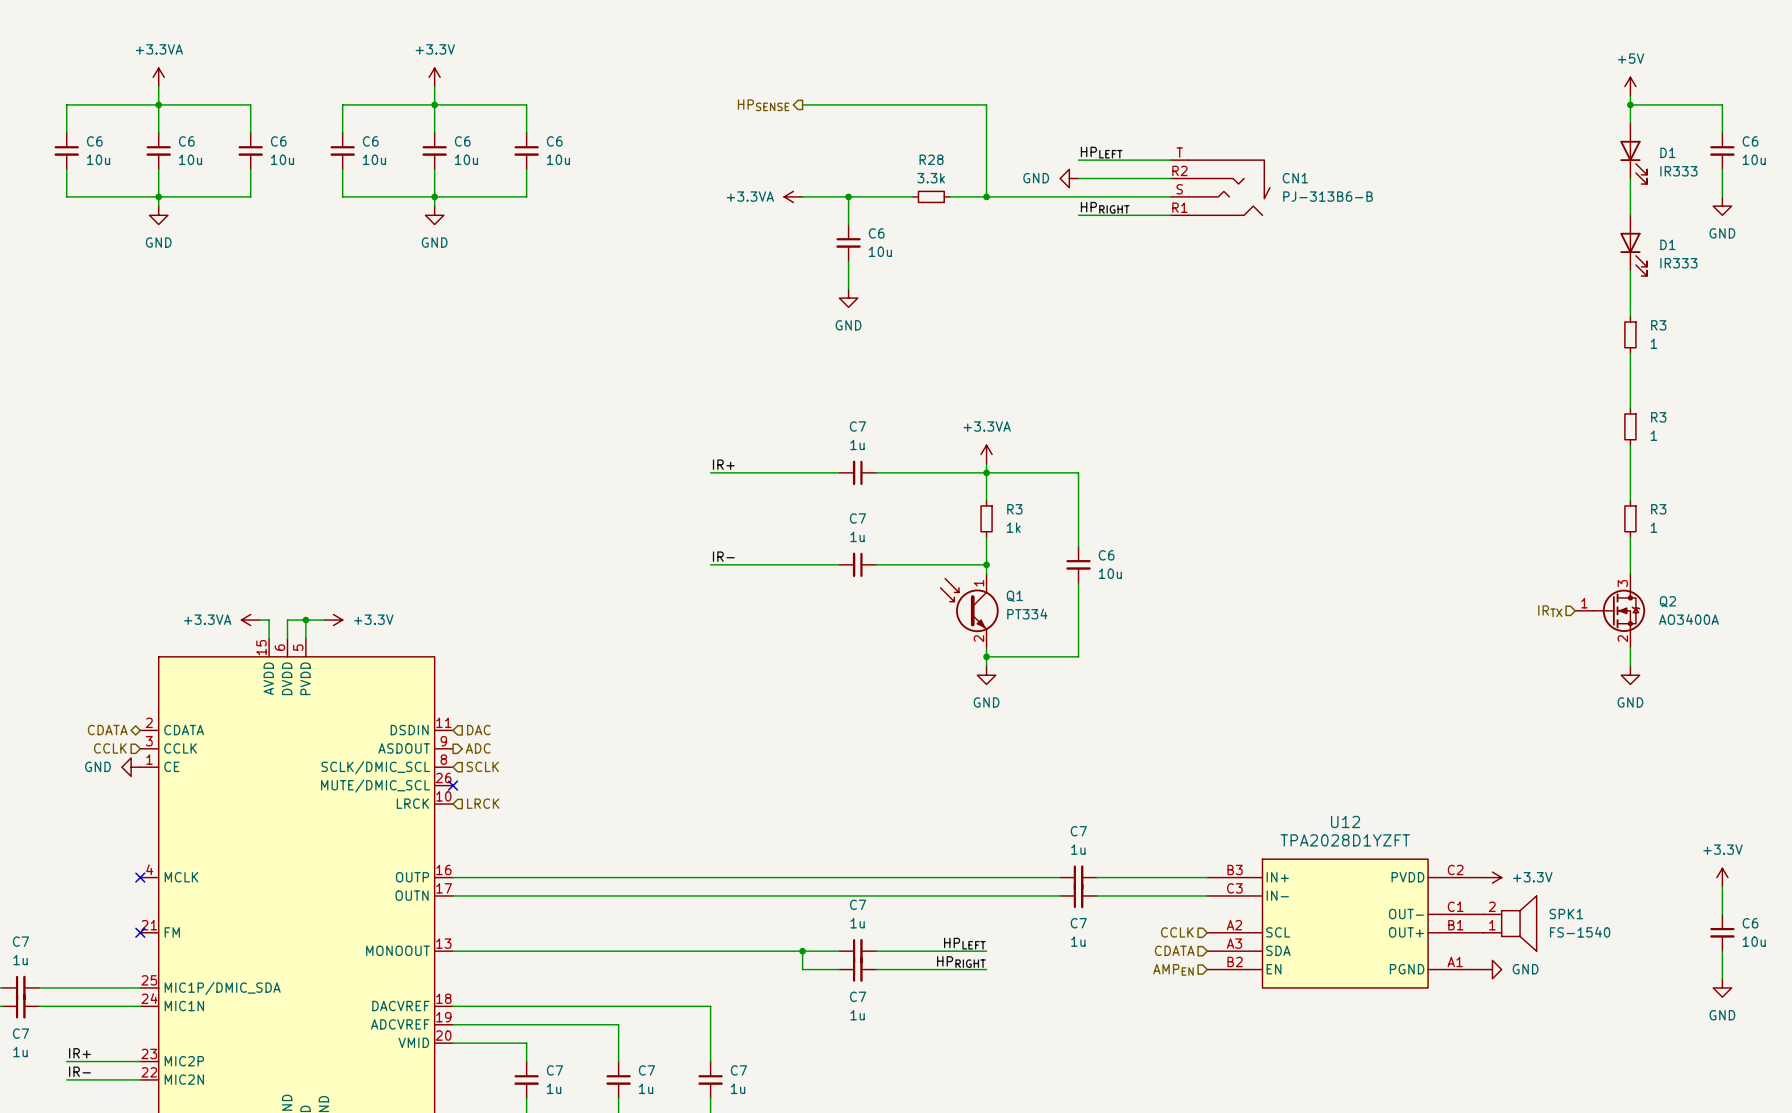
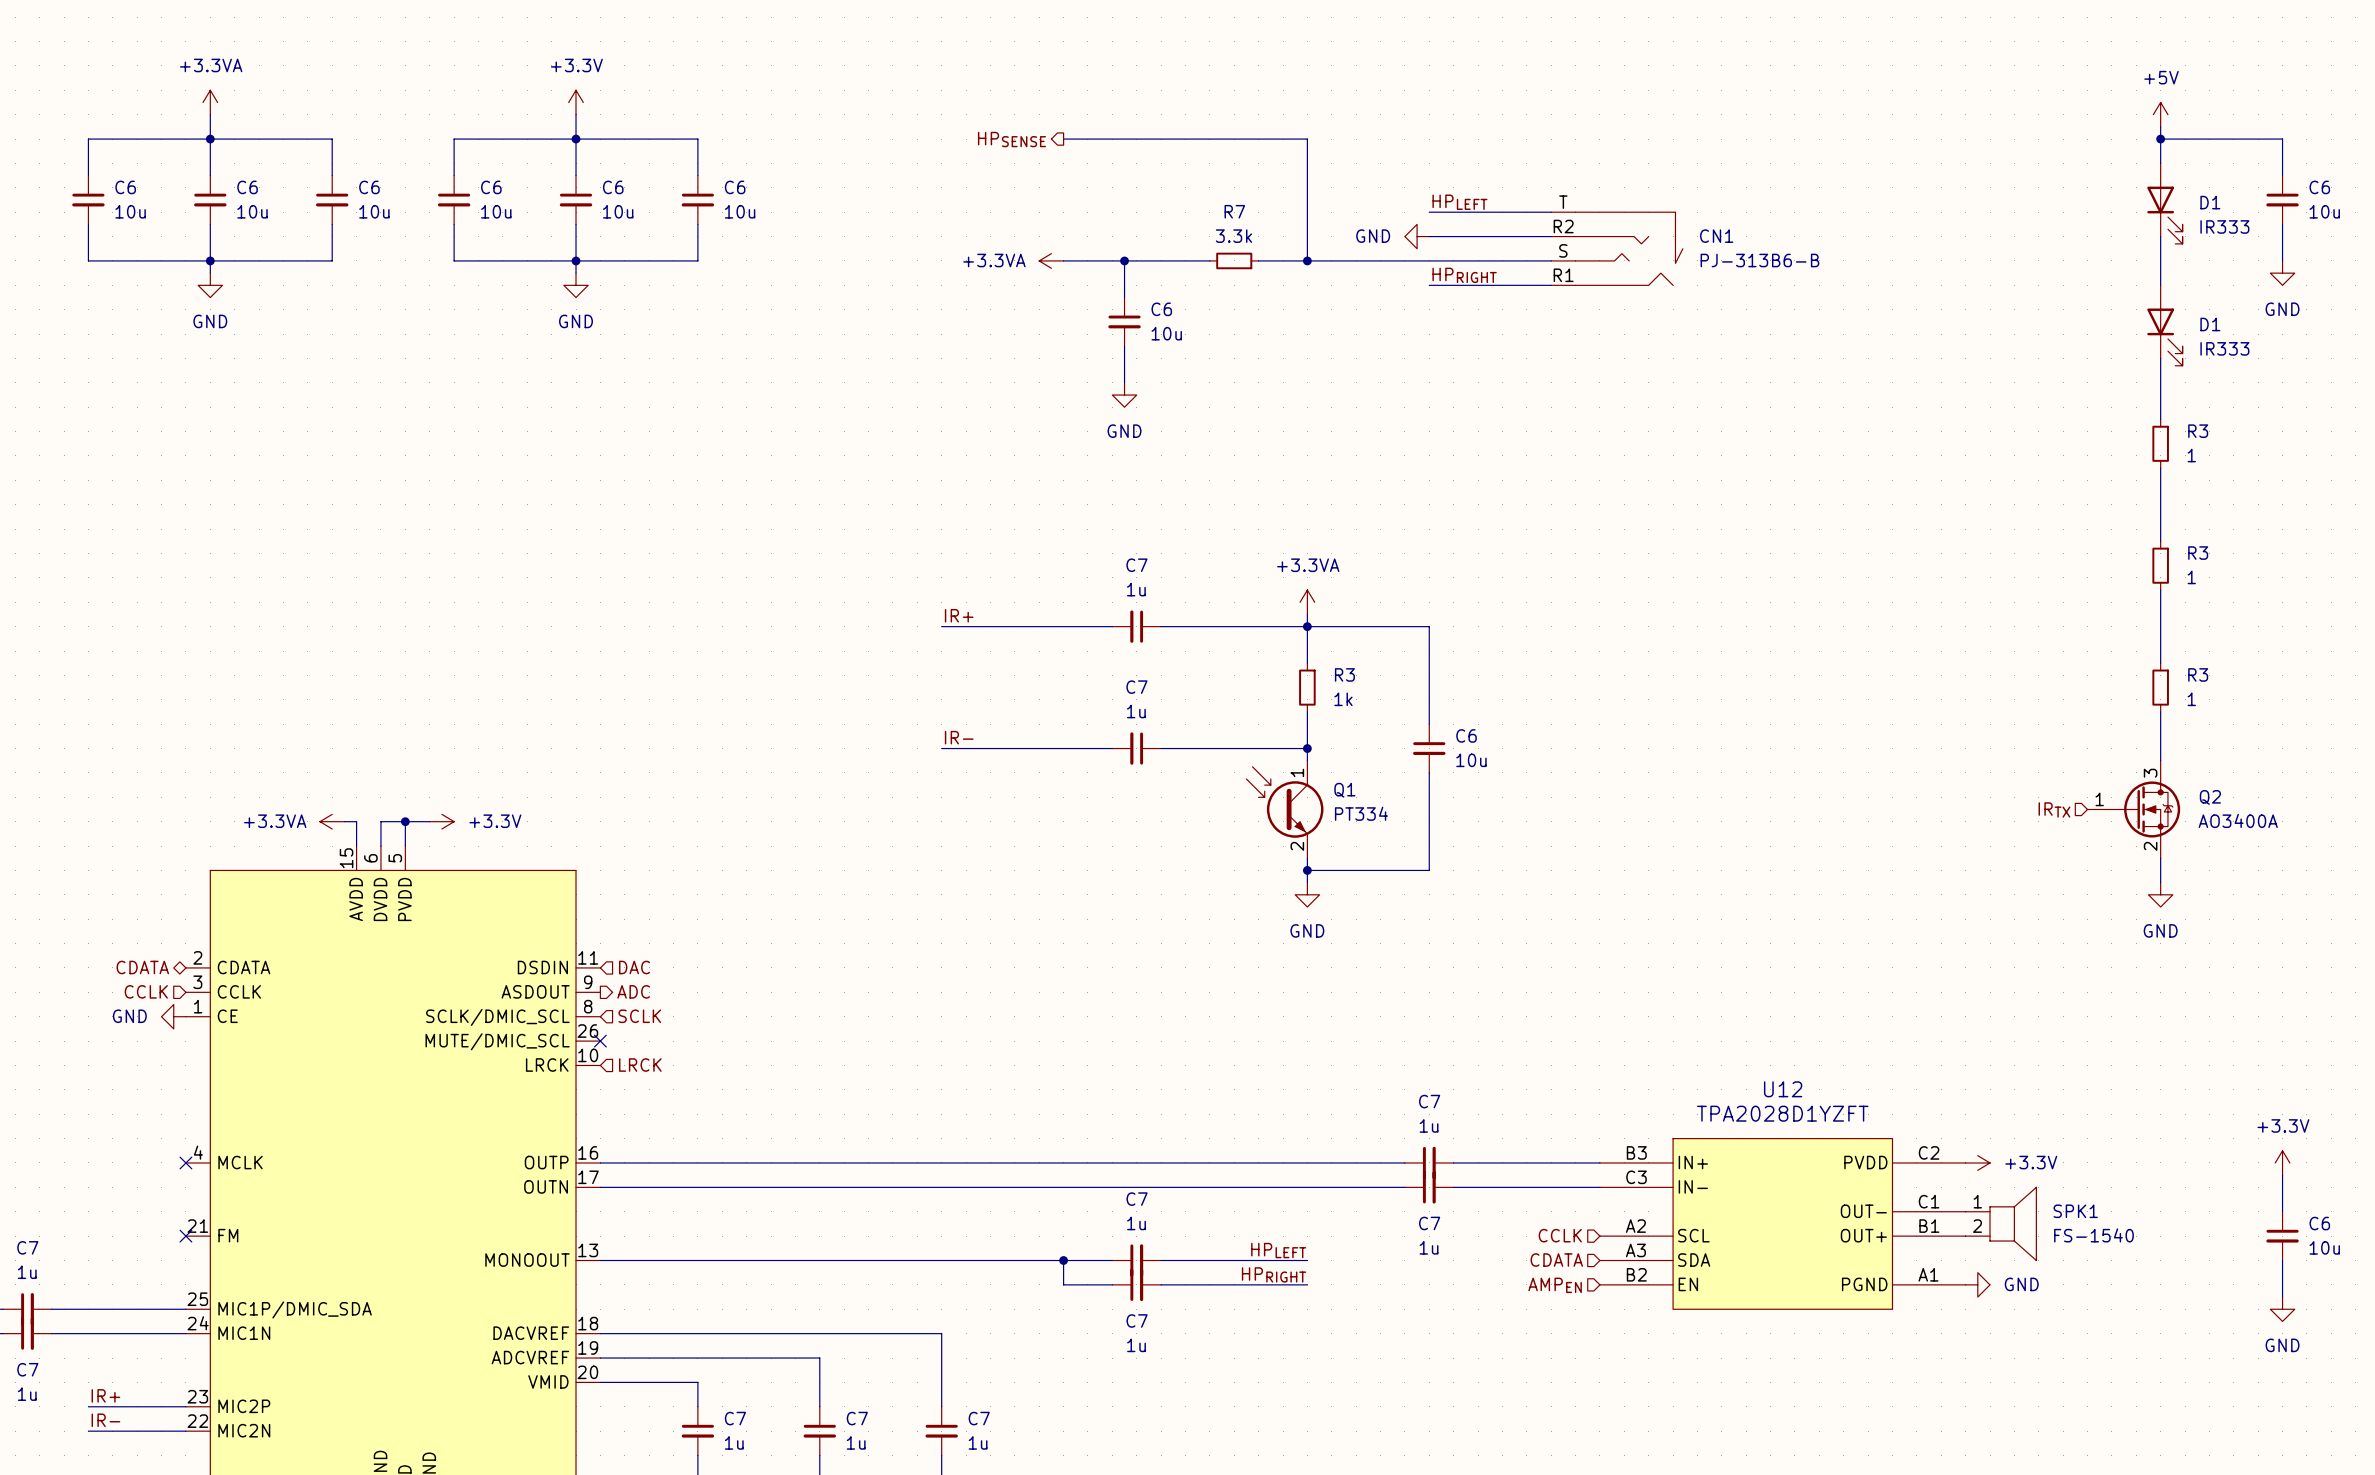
R28 name: R28 (931, 159) -> R7 (1234, 211)
SPK1 flip: as is (1519, 923) -> up-down (2013, 1223)

